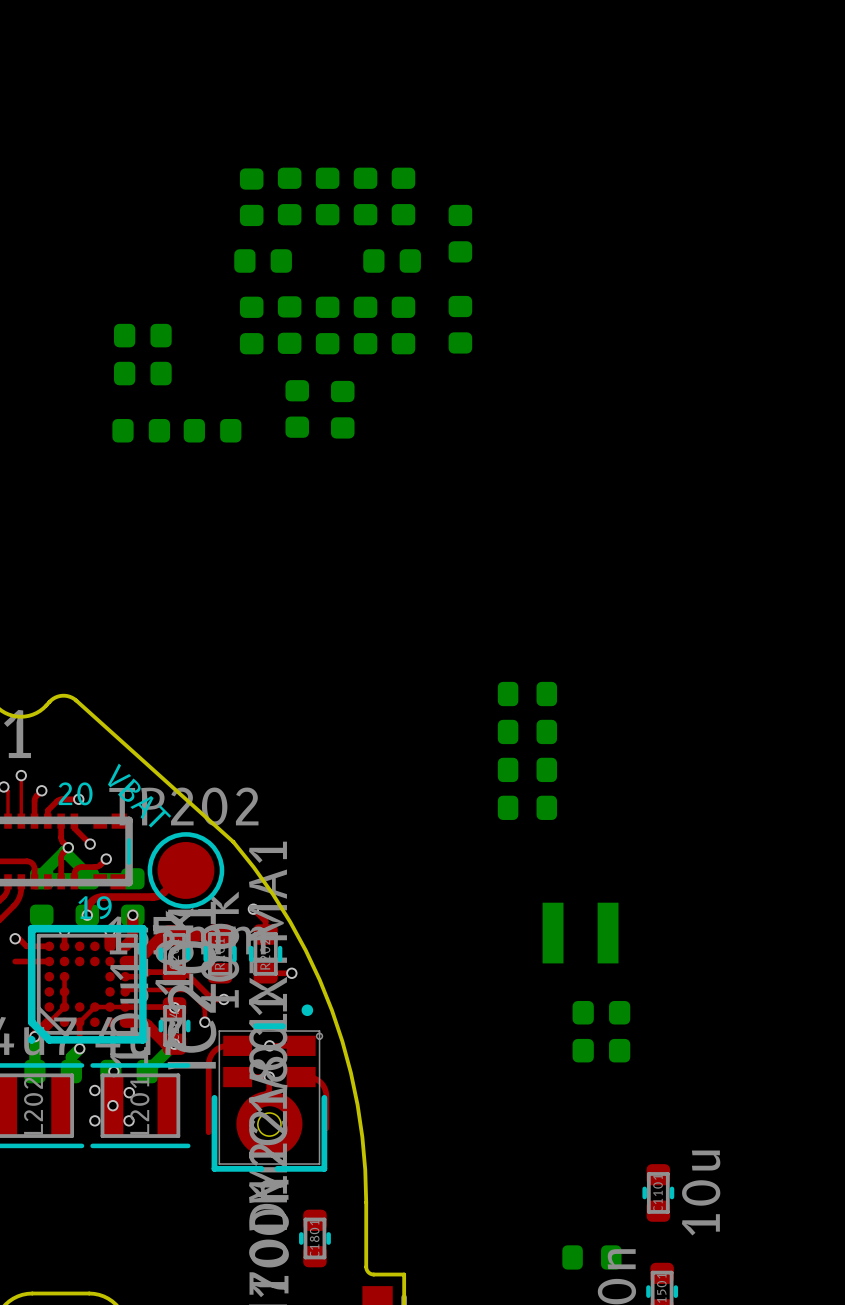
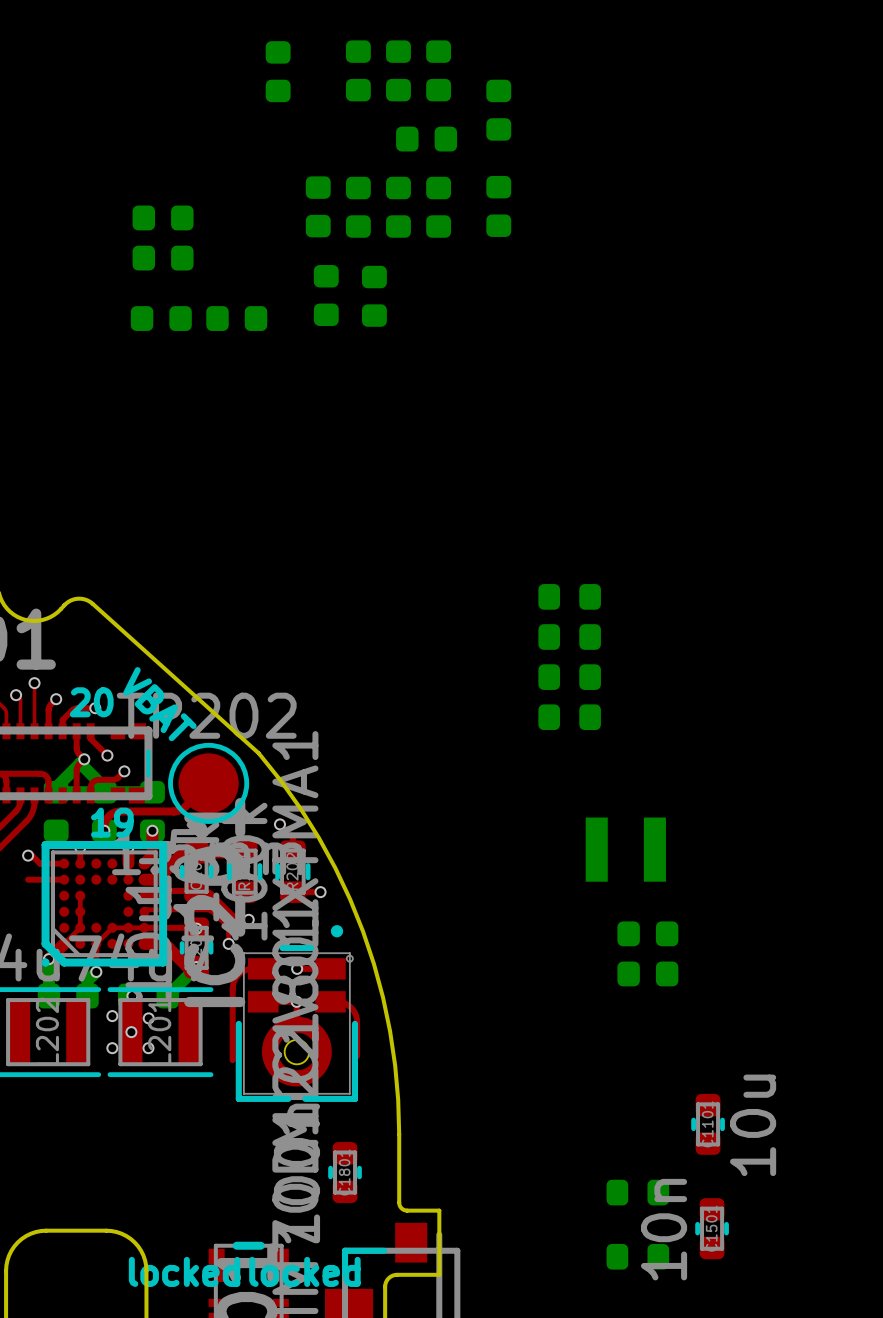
part: (289, 196) -> none
part: (263, 260) -> none
part: (251, 325) -> none

